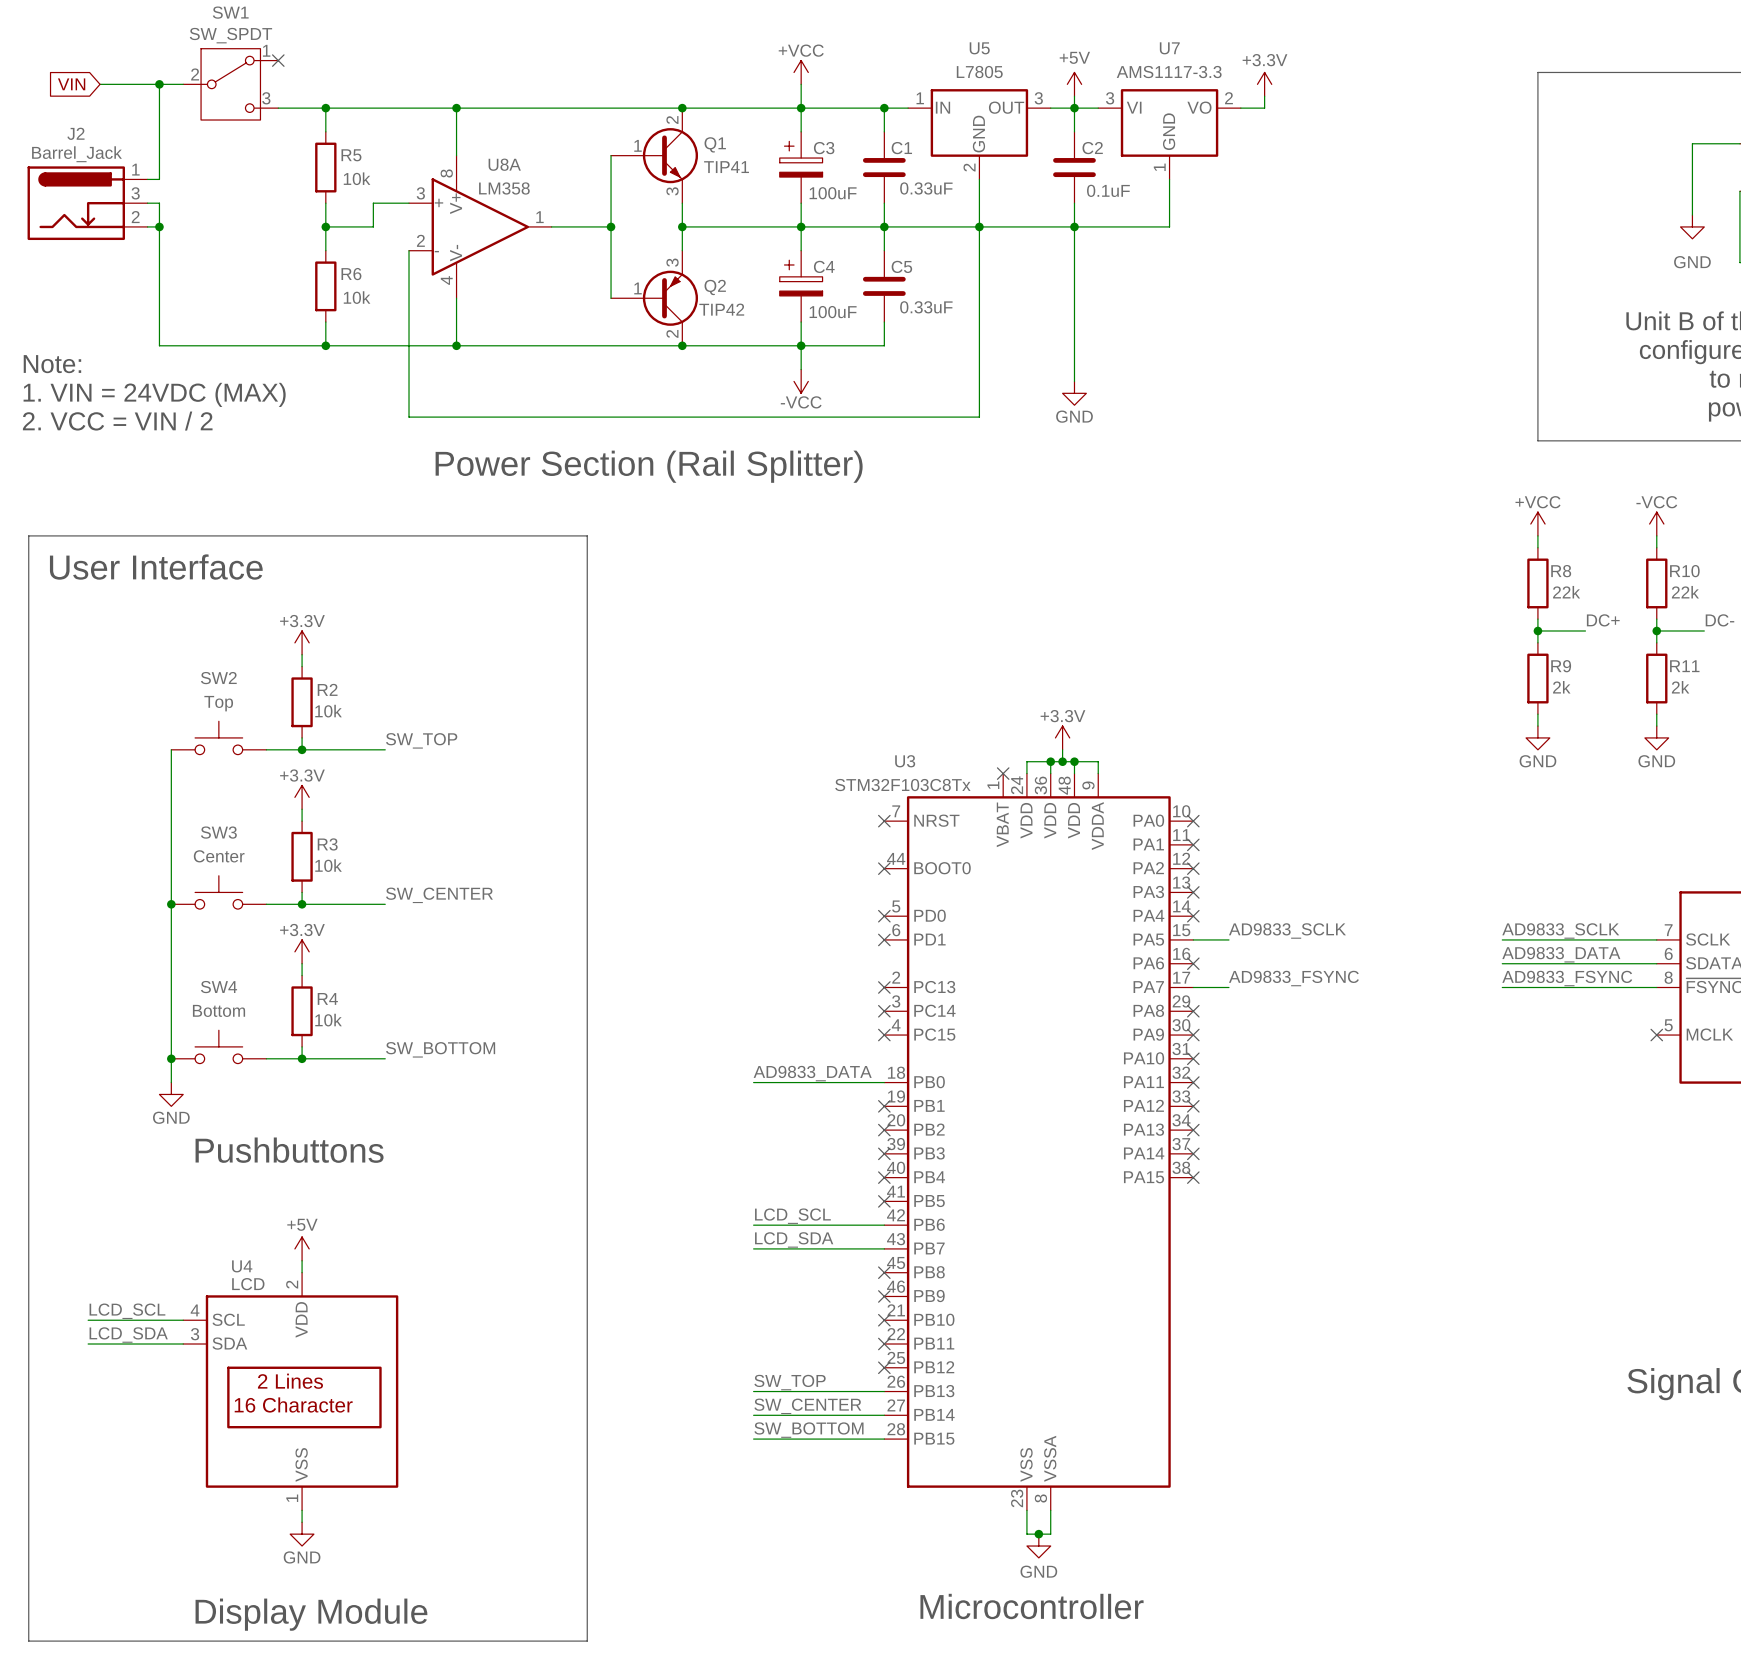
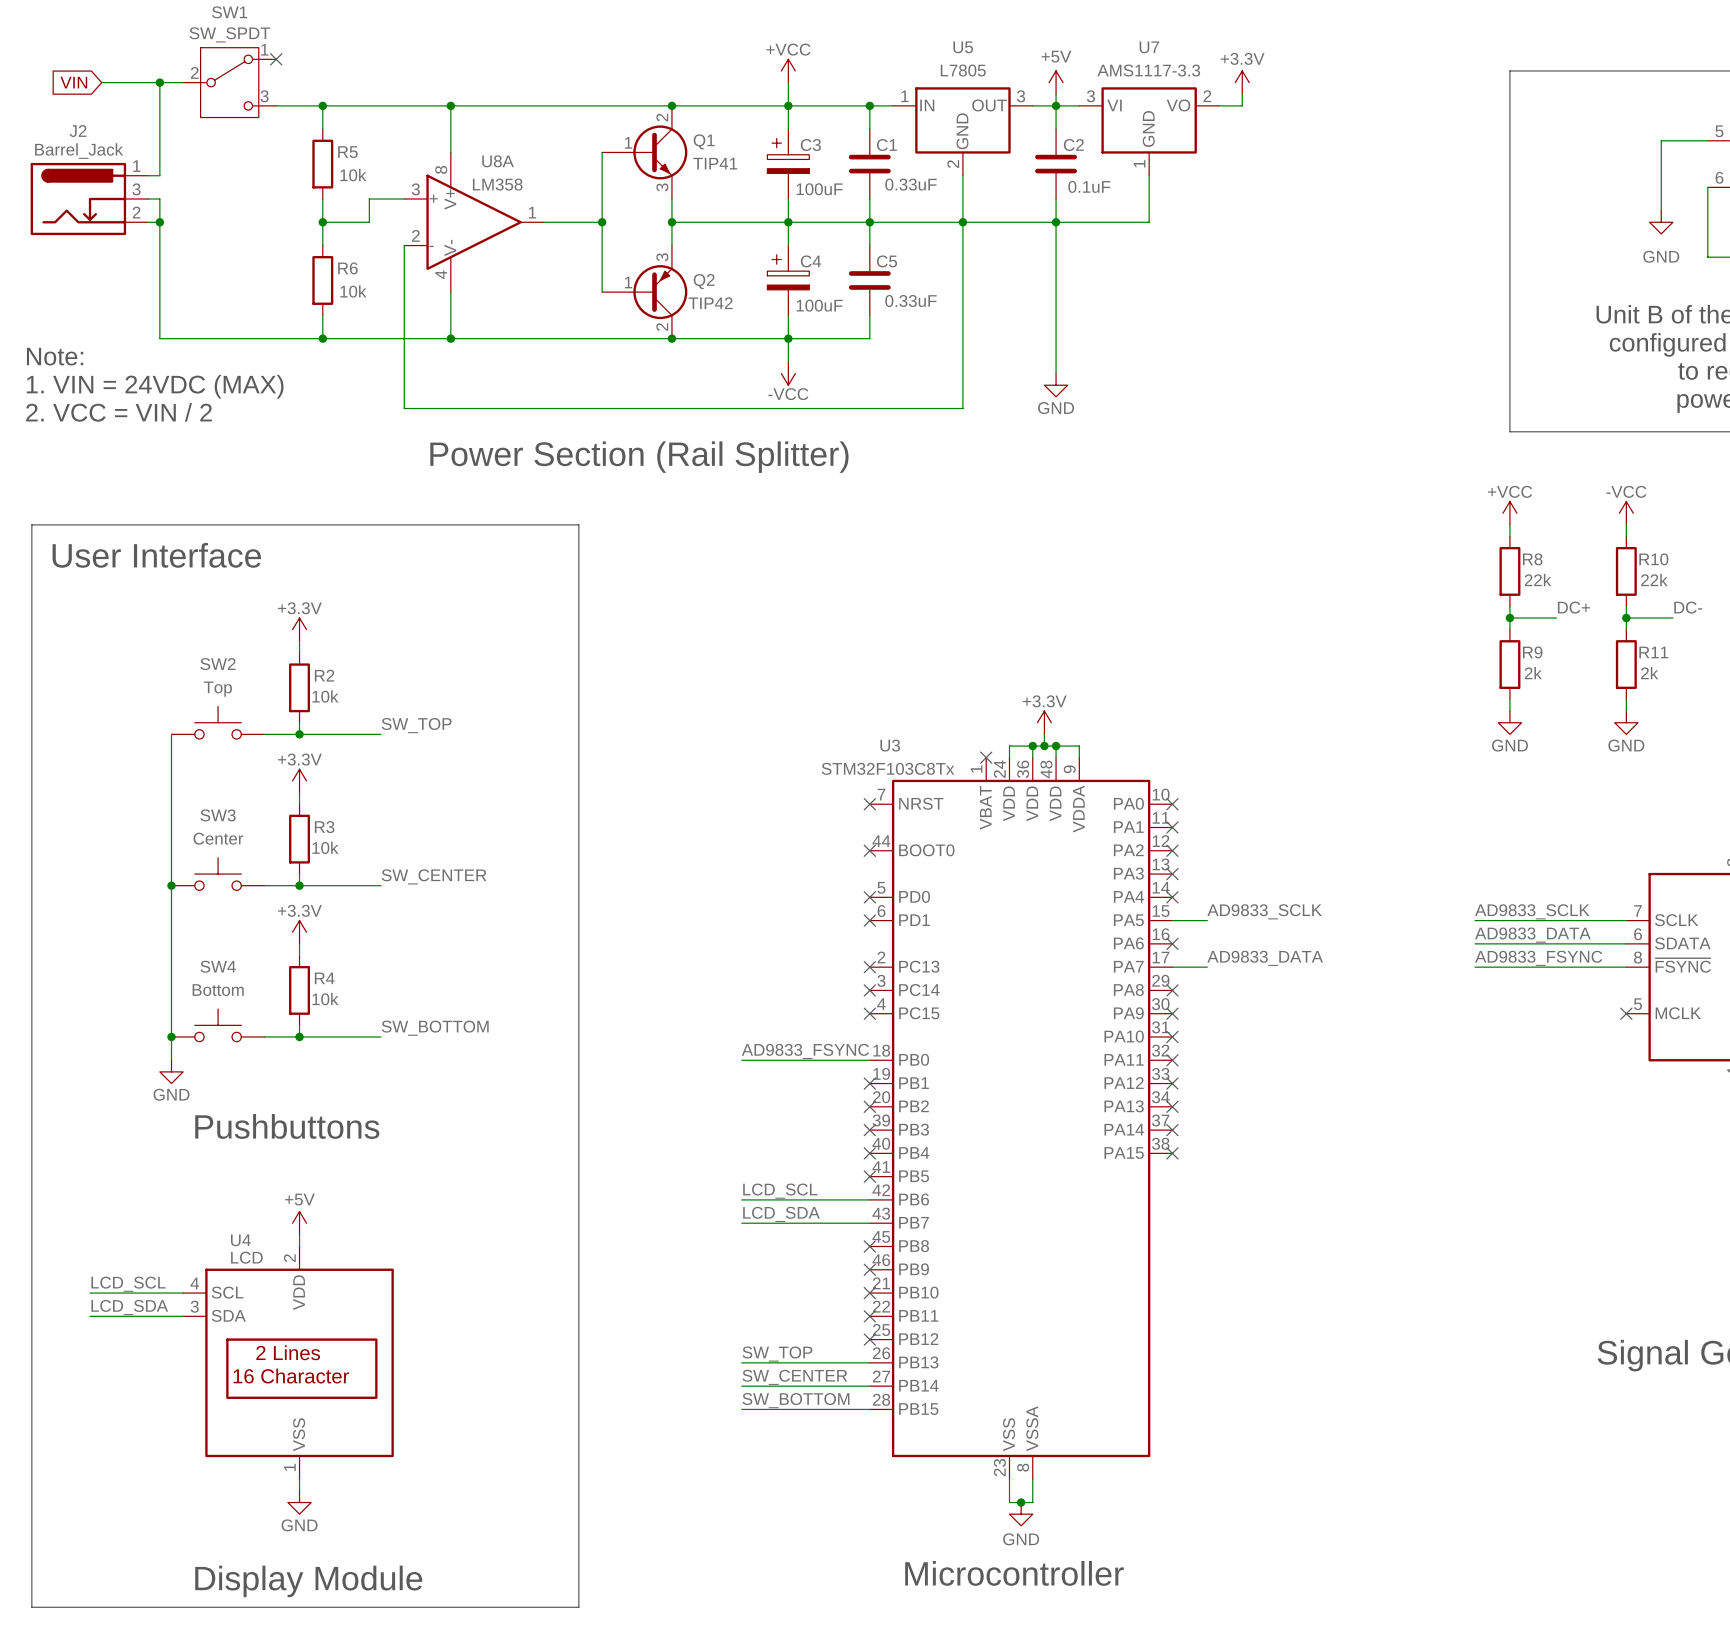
label: AD9833_FSYNC (1293, 978) -> AD9833_DATA (1265, 958)
label: AD9833_DATA (812, 1073) -> AD9833_FSYNC (805, 1051)

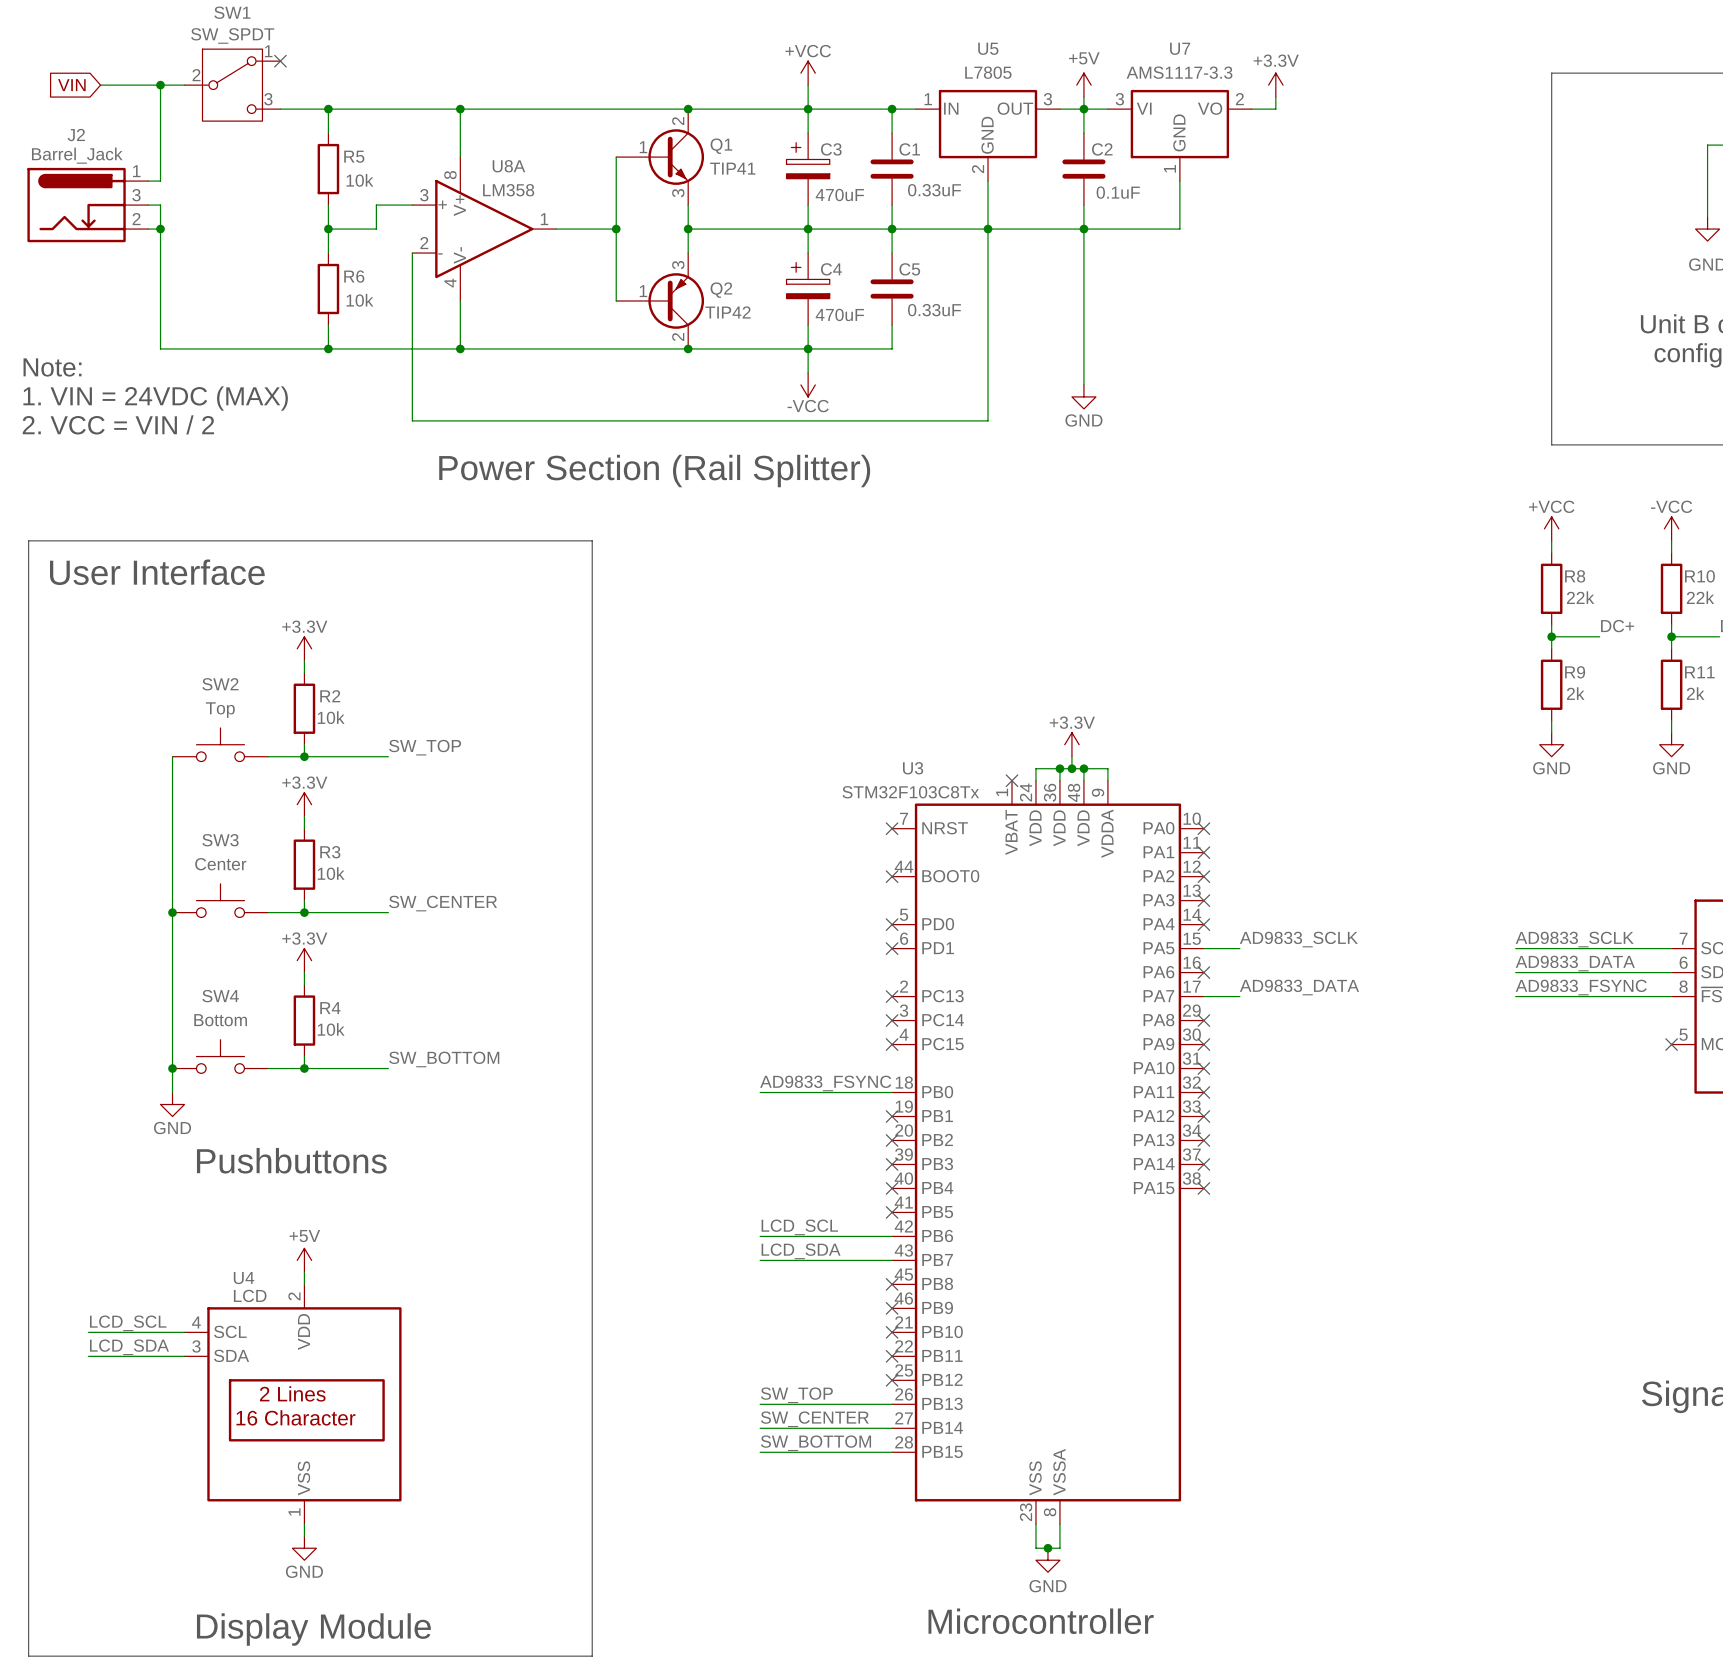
C3 value: 100uF (819, 189) -> 470uF (839, 195)
C4 value: 100uF (819, 305) -> 470uF (839, 314)

